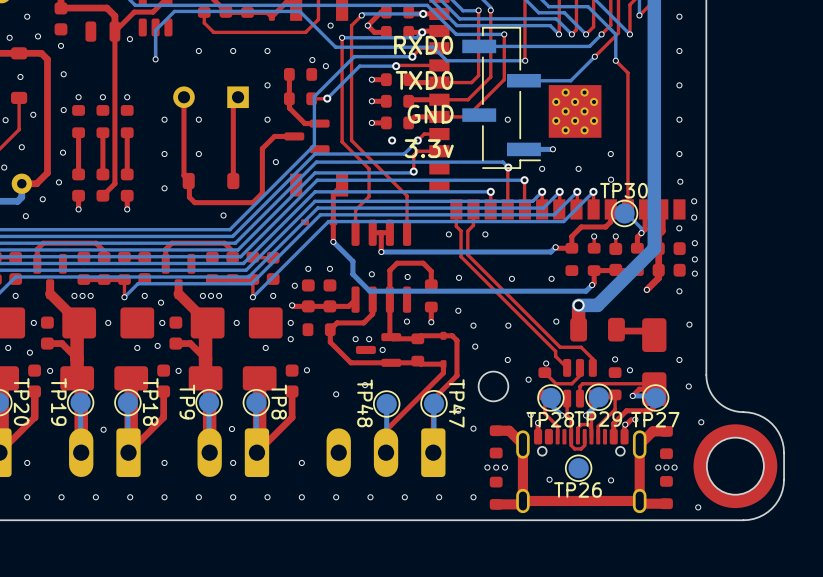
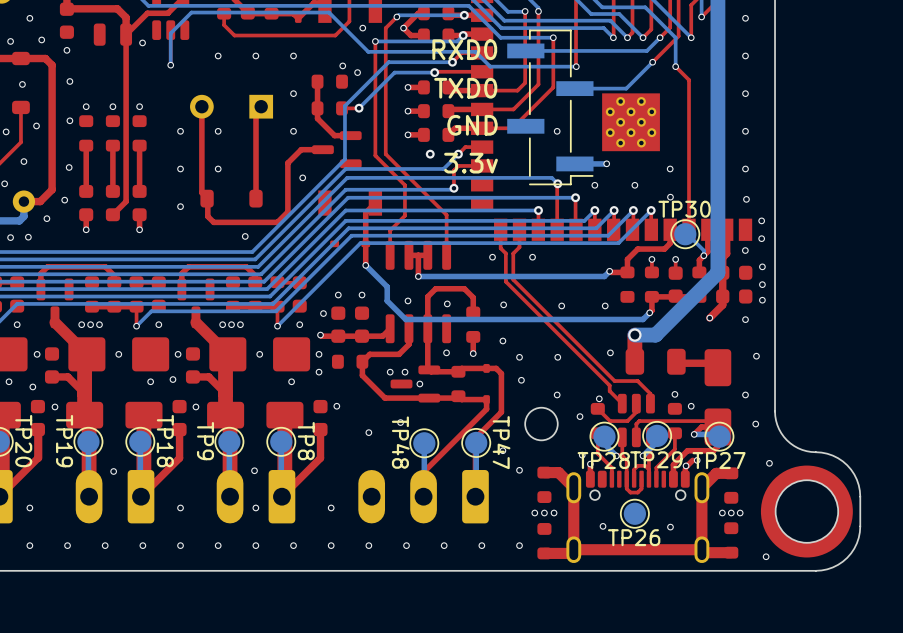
via: none -> (10, 237)
via: (161, 302) -> none

